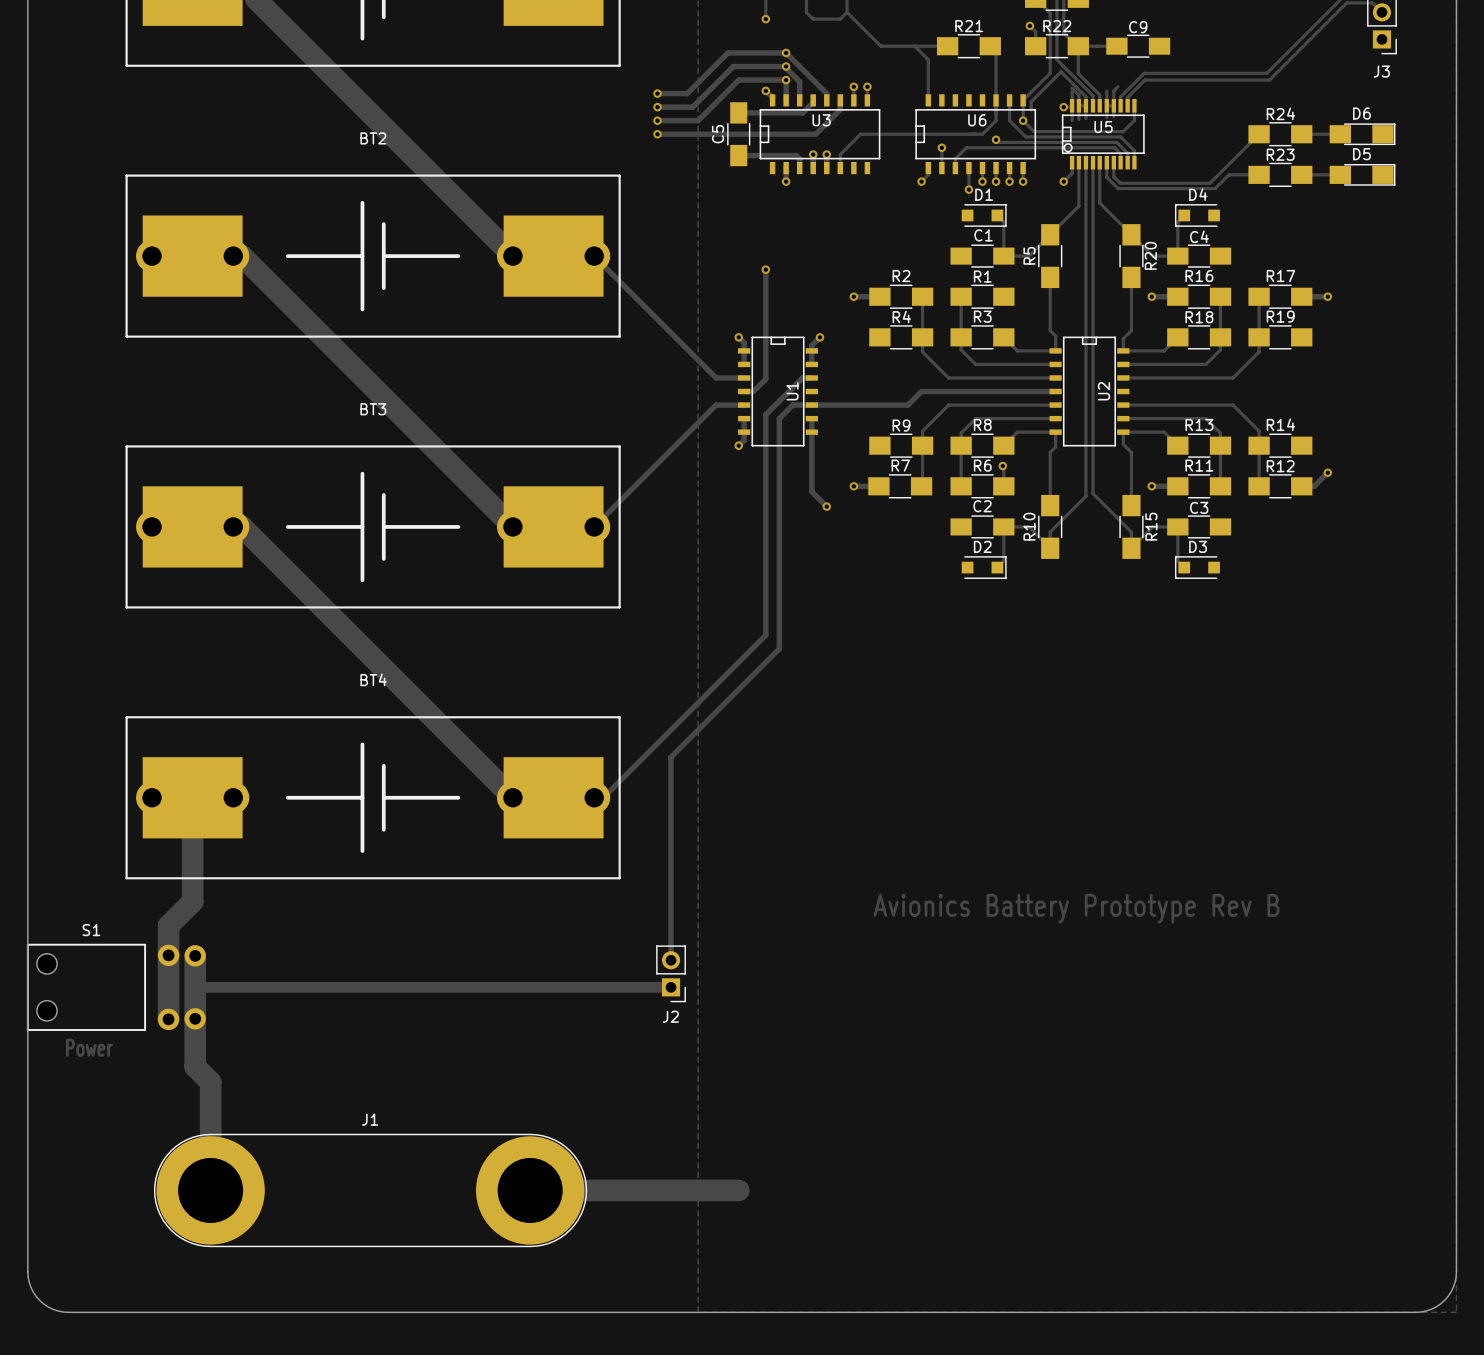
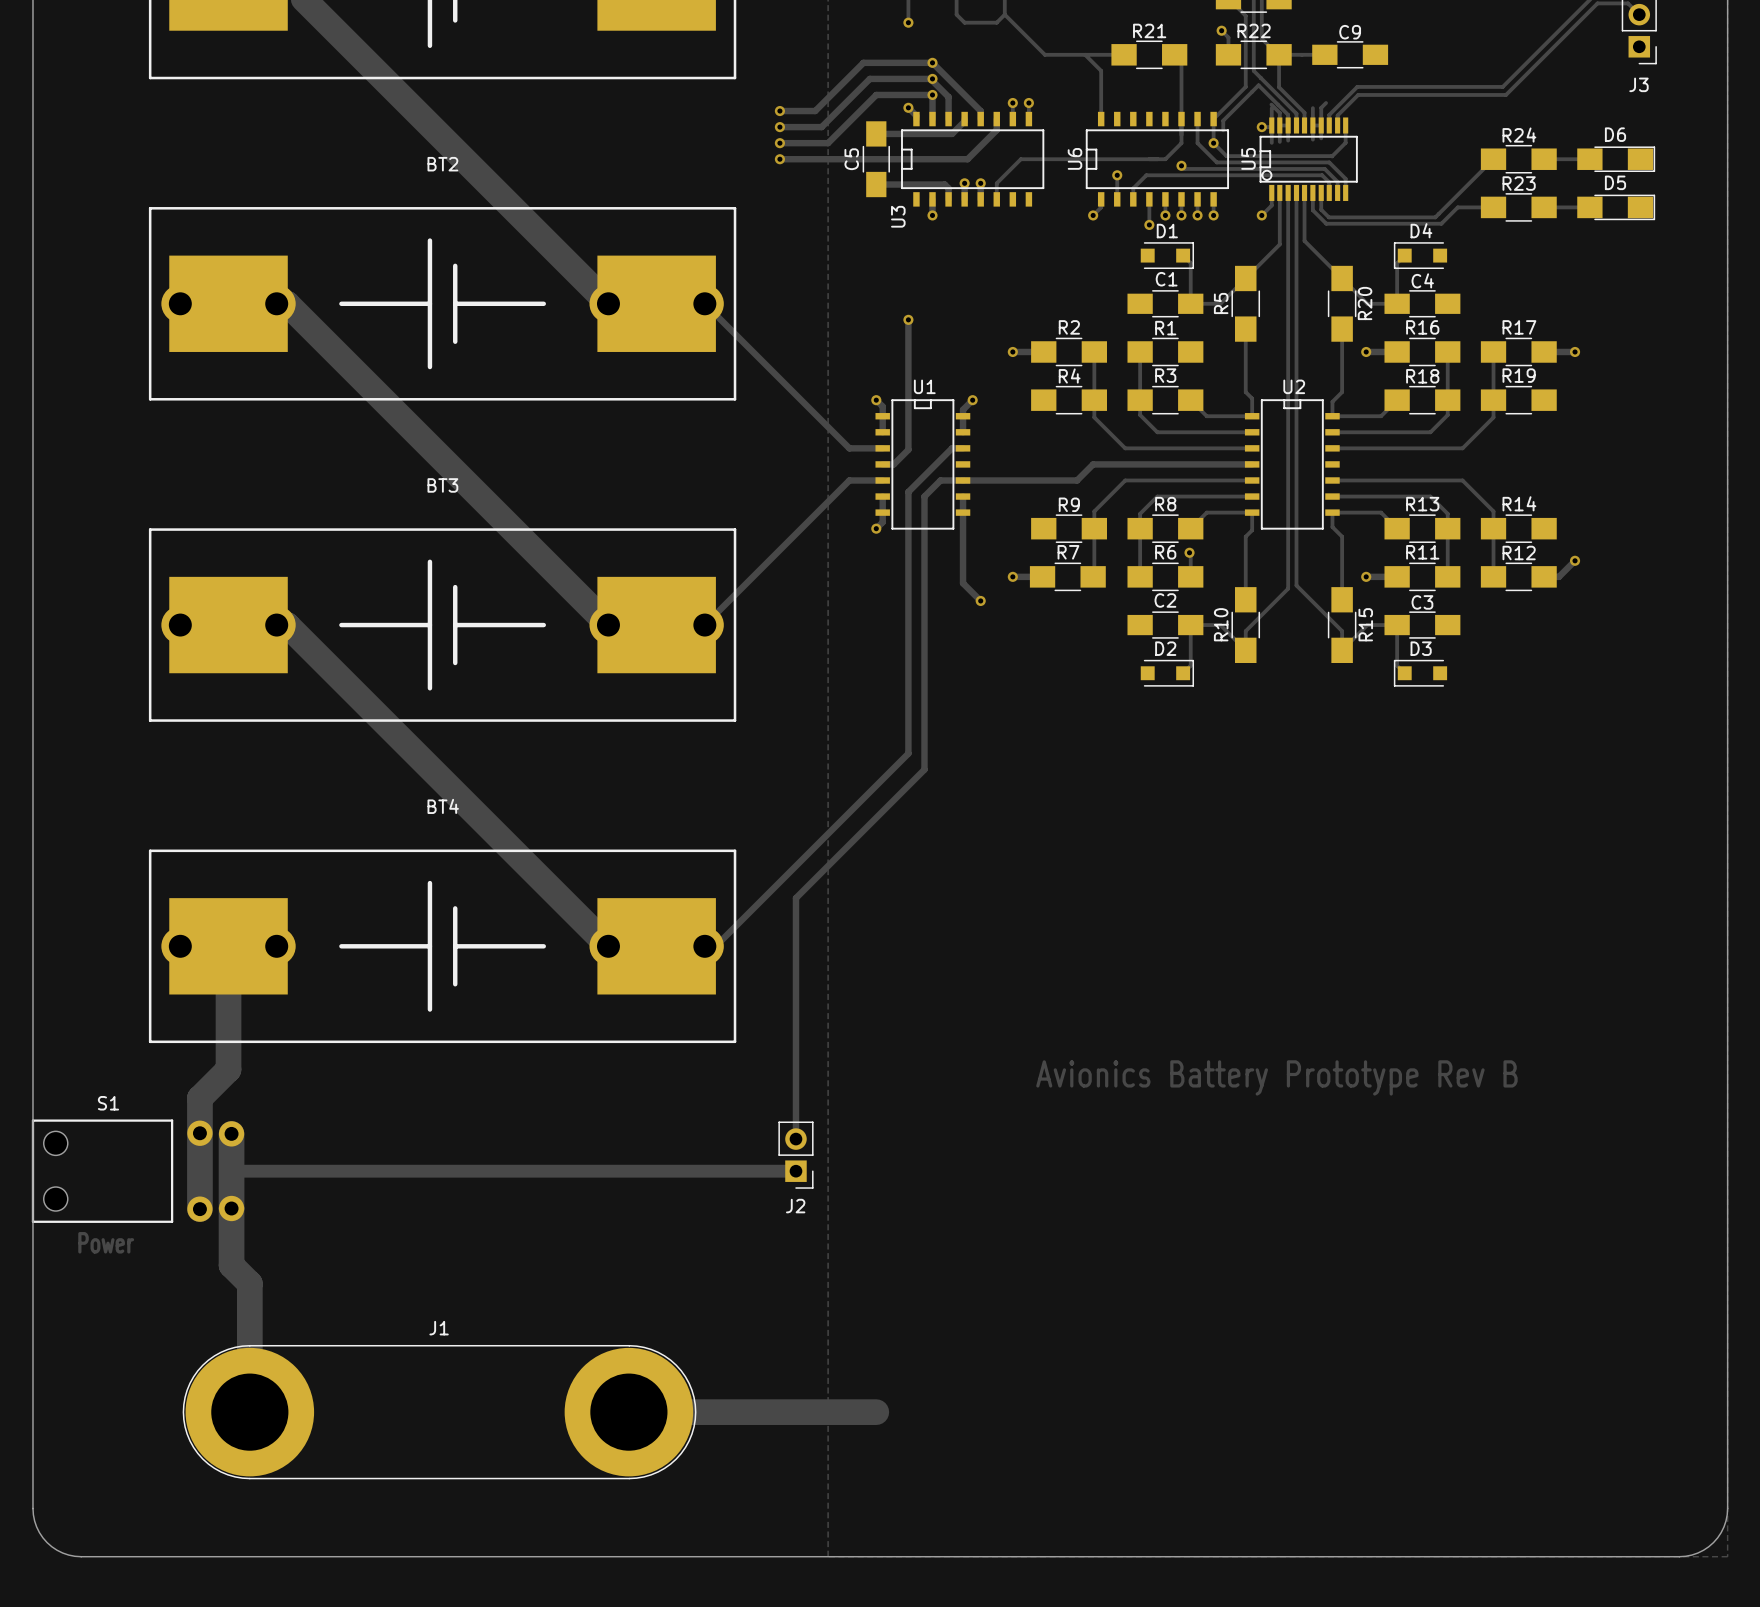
U3 name rotation: 0° (821, 120) -> 90° counterclockwise (898, 216)
U3 name position: U3 (821, 120) -> U3 (898, 216)
U6 name rotation: 0° (977, 120) -> 90° counterclockwise (1075, 158)
U6 name position: U6 (977, 120) -> U6 (1075, 158)
U5 name rotation: 0° (1103, 127) -> 90° counterclockwise (1248, 158)
U5 name position: U5 (1103, 127) -> U5 (1248, 158)
U1 name rotation: 0° (792, 391) -> 90° clockwise (924, 386)
U1 name position: U1 (792, 391) -> U1 (924, 386)
U2 name rotation: 0° (1103, 391) -> 90° clockwise (1294, 386)
U2 name position: U2 (1103, 391) -> U2 (1294, 386)

